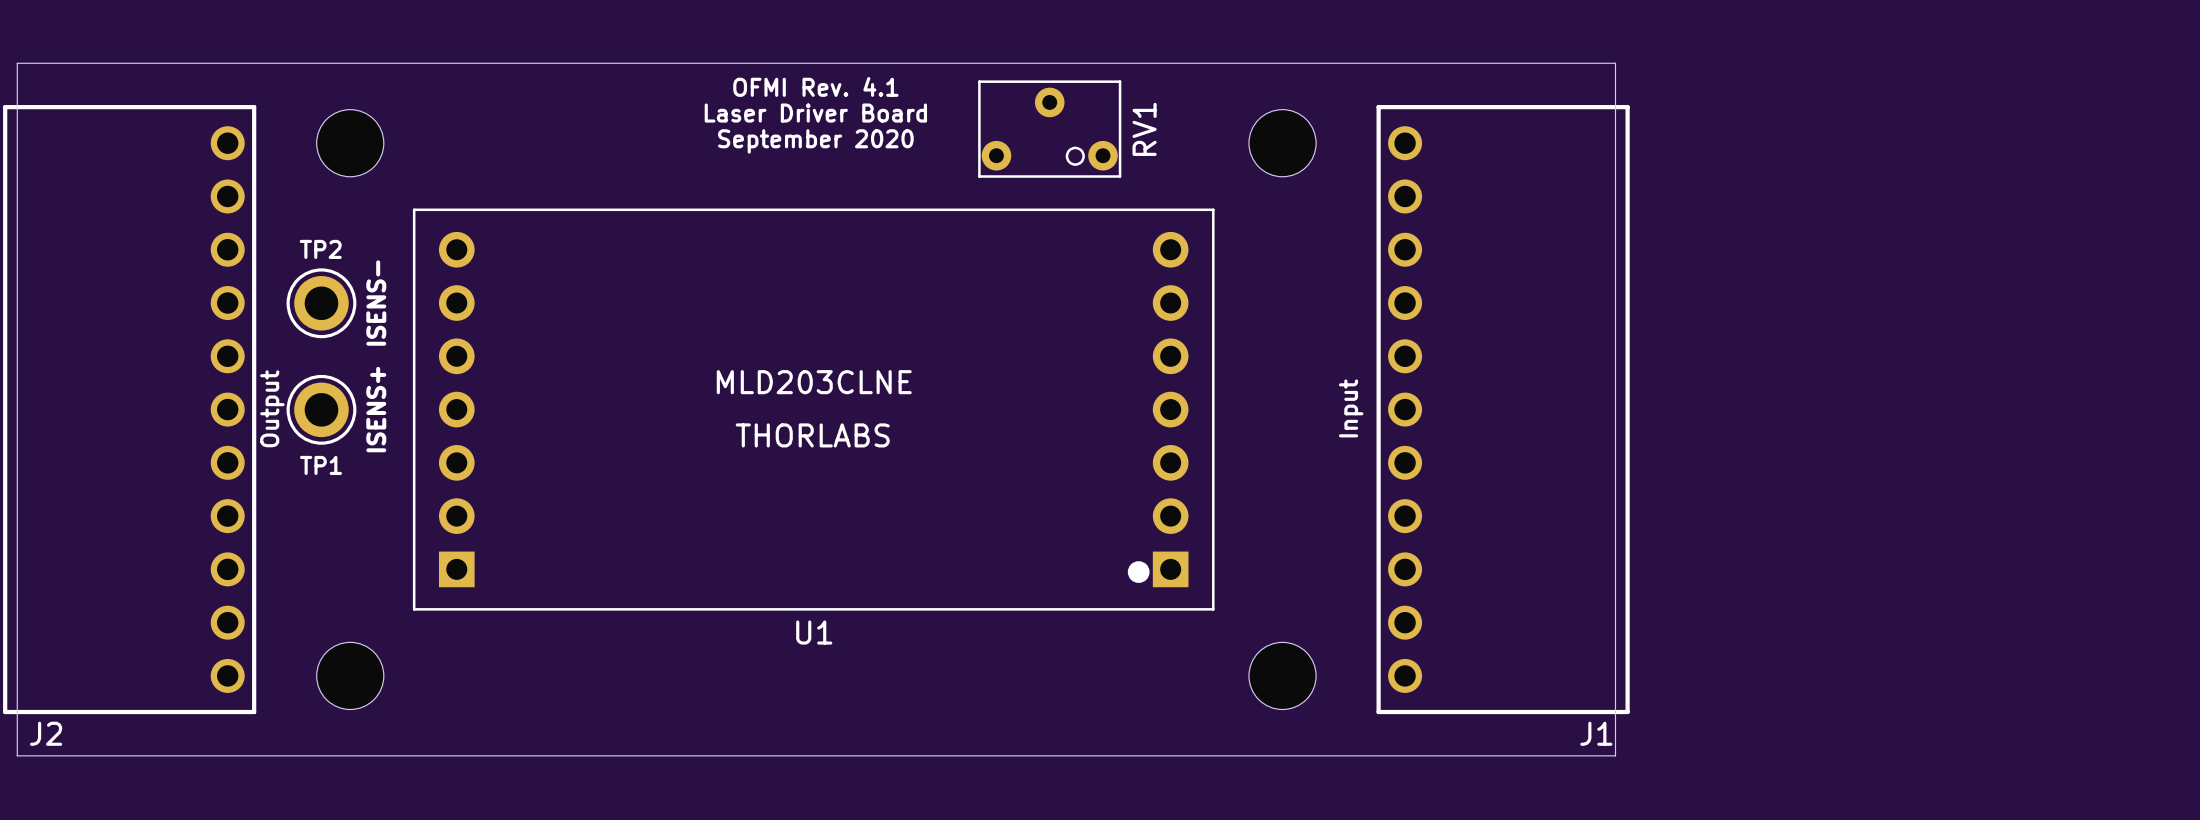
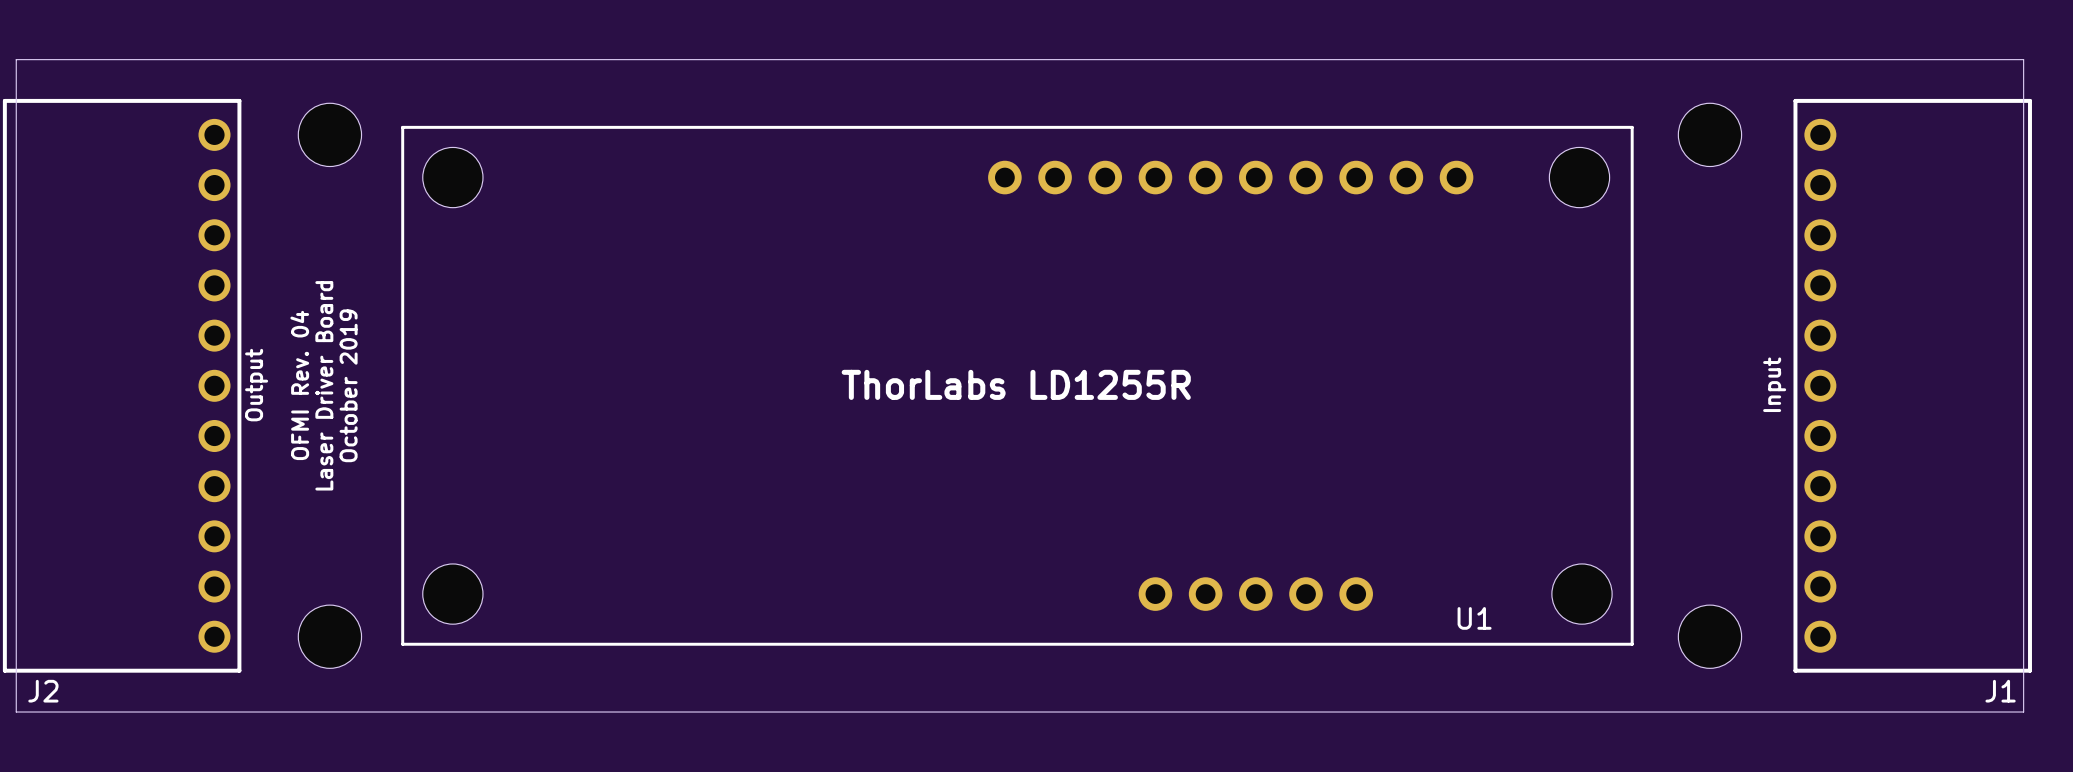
board edge: (1615, 63) (1615, 755) -> (1521, 59) (2023, 59) (2023, 712) (1521, 712)
text: OFMI Rev. 4.1 (815, 86) -> none
text: Laser Driver Board (815, 113) -> none
RV1: (1049, 129) -> none
text: September 2020 (815, 141) -> none
part: (1282, 143) -> none
part: none -> (1709, 134)
U1 footprint: [412, 208, 1215, 611] -> [401, 125, 1634, 646]
TP2: (321, 303) -> none
text: ISENS- (376, 303) -> none
text: Input (1351, 408) -> none
text: none -> Input (1774, 384)
text: none -> OFMI Rev. 04 (299, 385)
TP1: (321, 409) -> none
text: none -> Laser Driver Board (324, 385)
text: ISENS+ (376, 409) -> October 2019 (348, 385)
J1 position: (1503, 409) -> (1912, 385)
U1 name position: U1 (814, 632) -> U1 (1474, 618)
part: (1282, 675) -> none
part: none -> (1709, 636)

